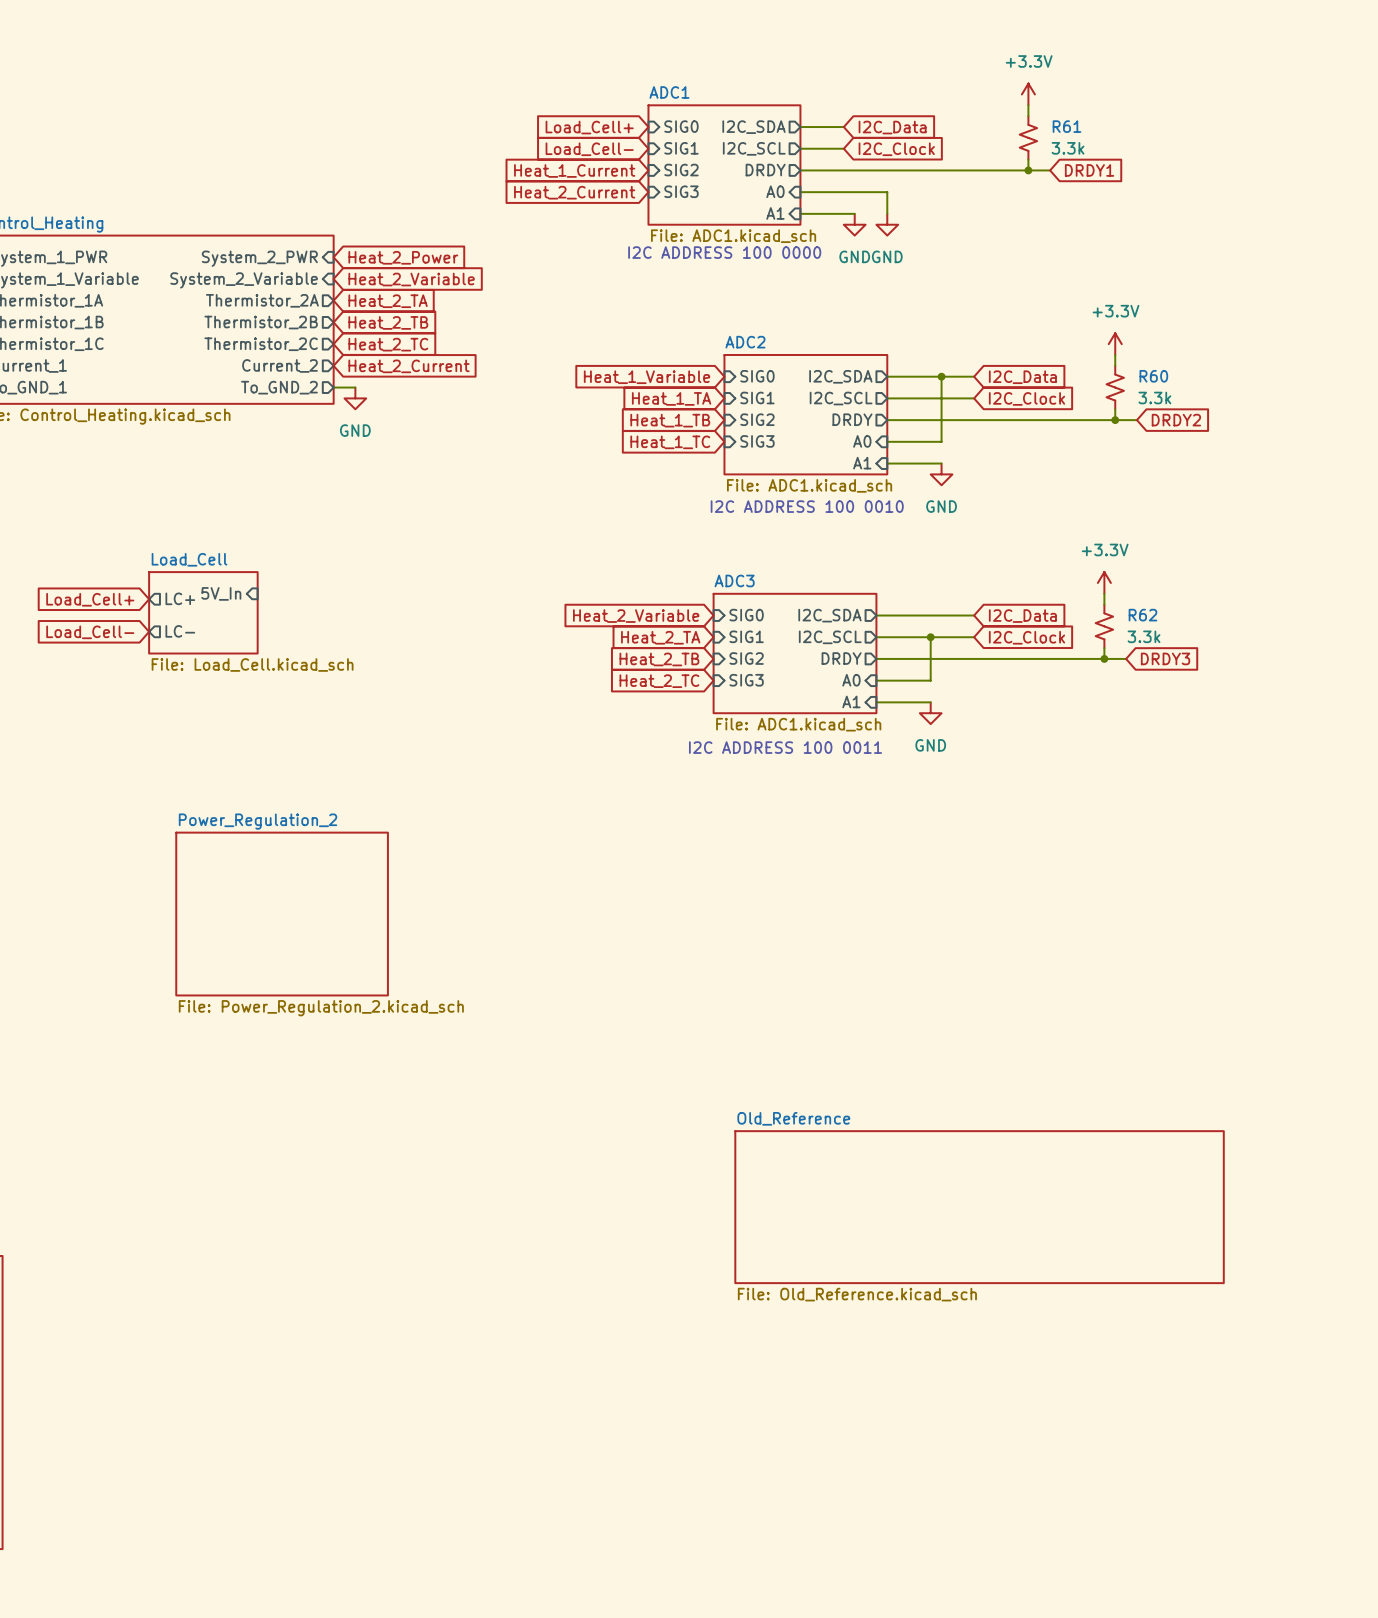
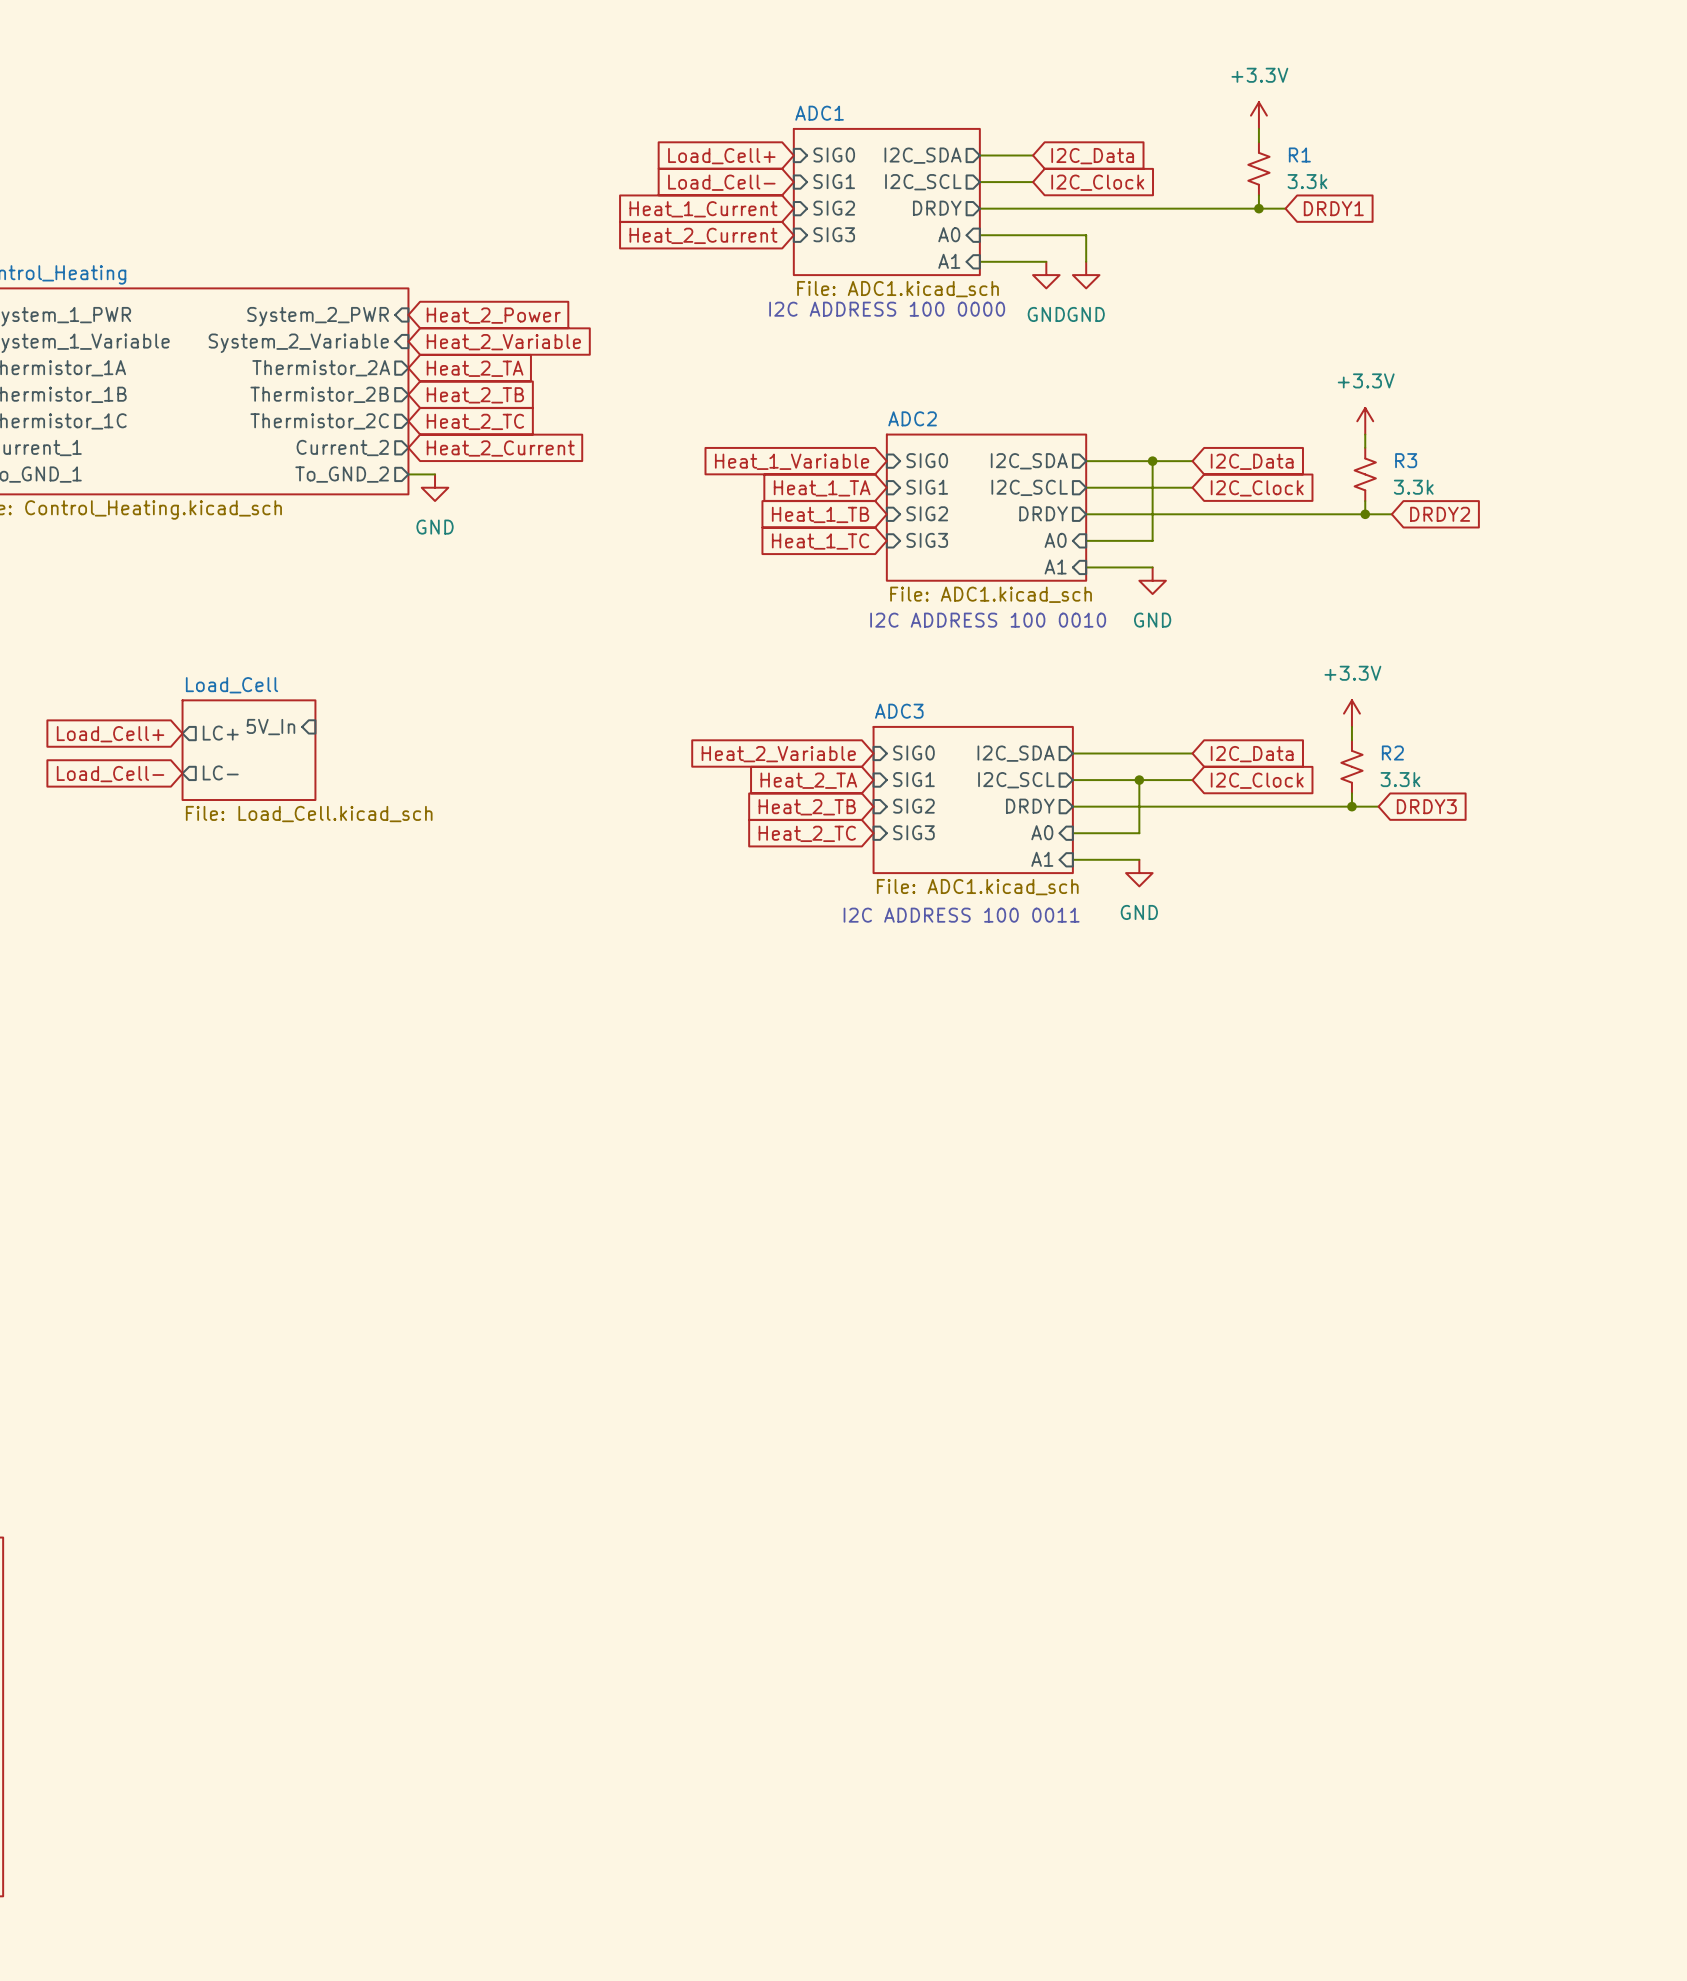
R61 name: R61 (1067, 126) -> R1 (1299, 155)
R60 name: R60 (1153, 376) -> R3 (1406, 460)
R62 name: R62 (1142, 615) -> R2 (1392, 753)
sheet Power_Regulation_2: File: Power_Regulation_2.kicad_sch (282, 914) -> none
sheet Old_Reference: File: Old_Reference.kicad_sch (979, 1207) -> none

